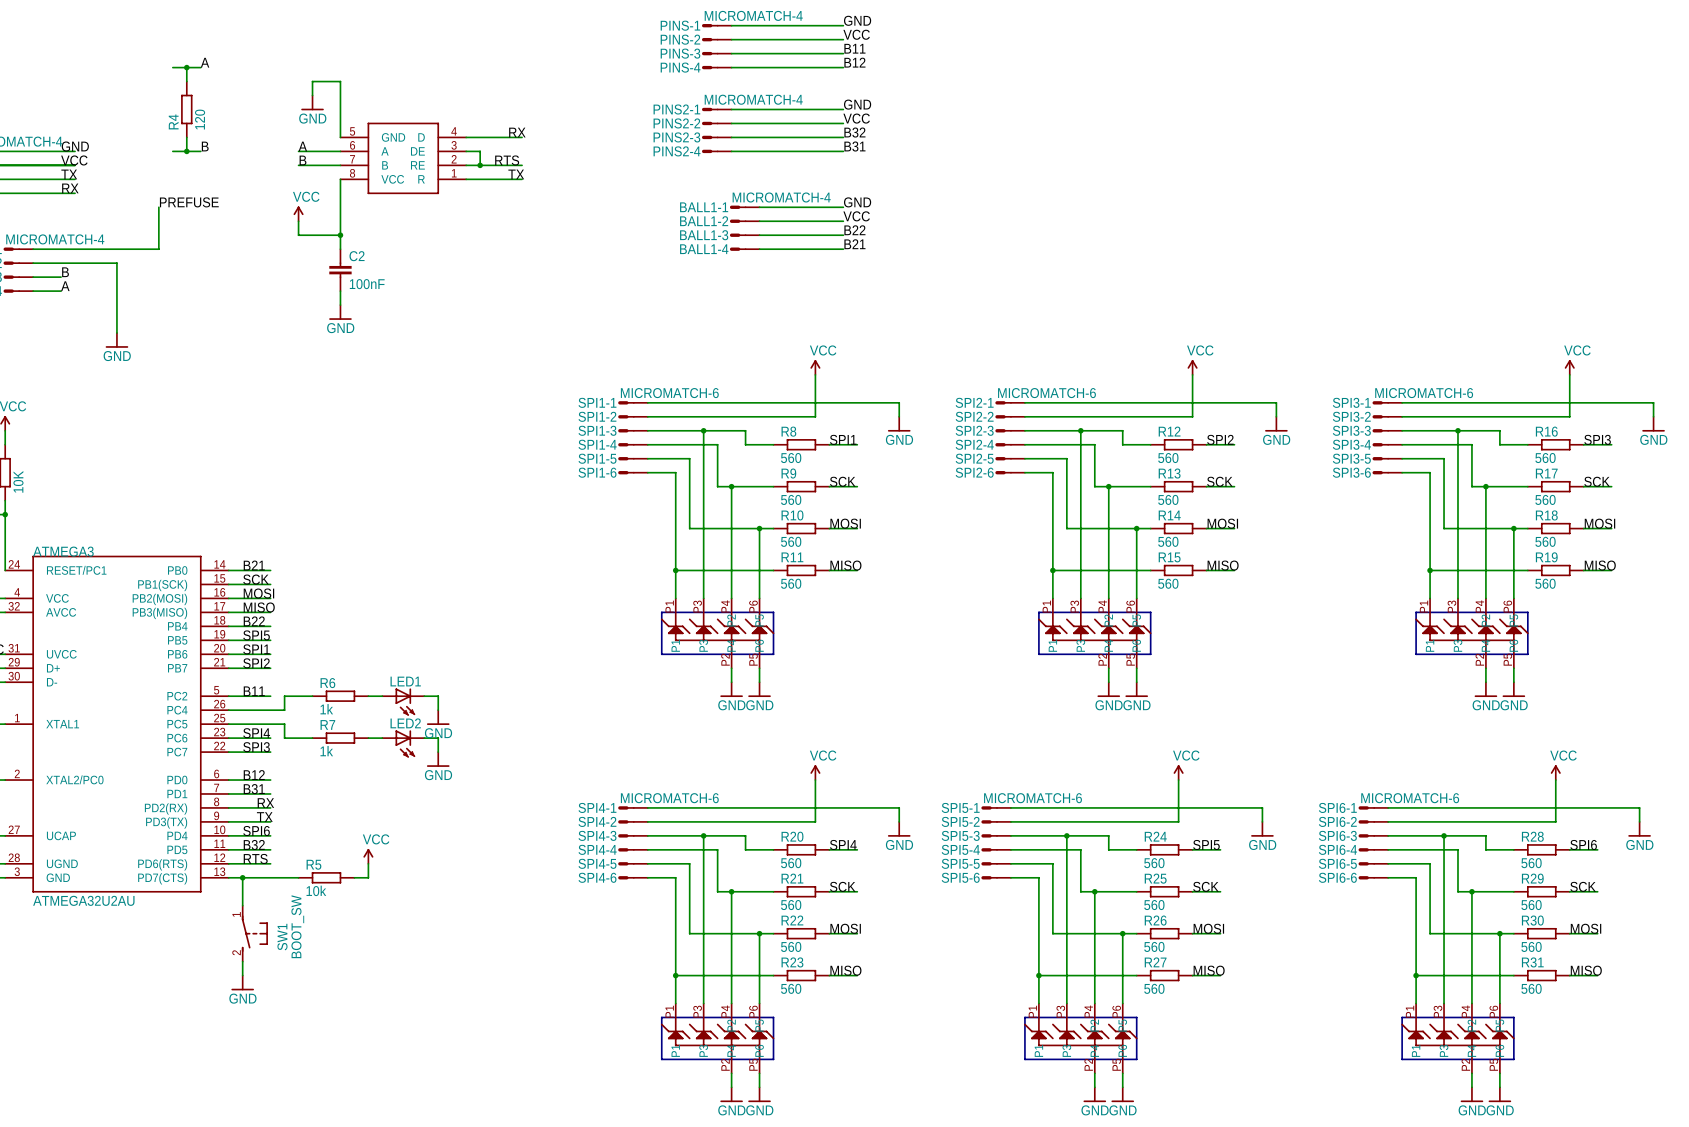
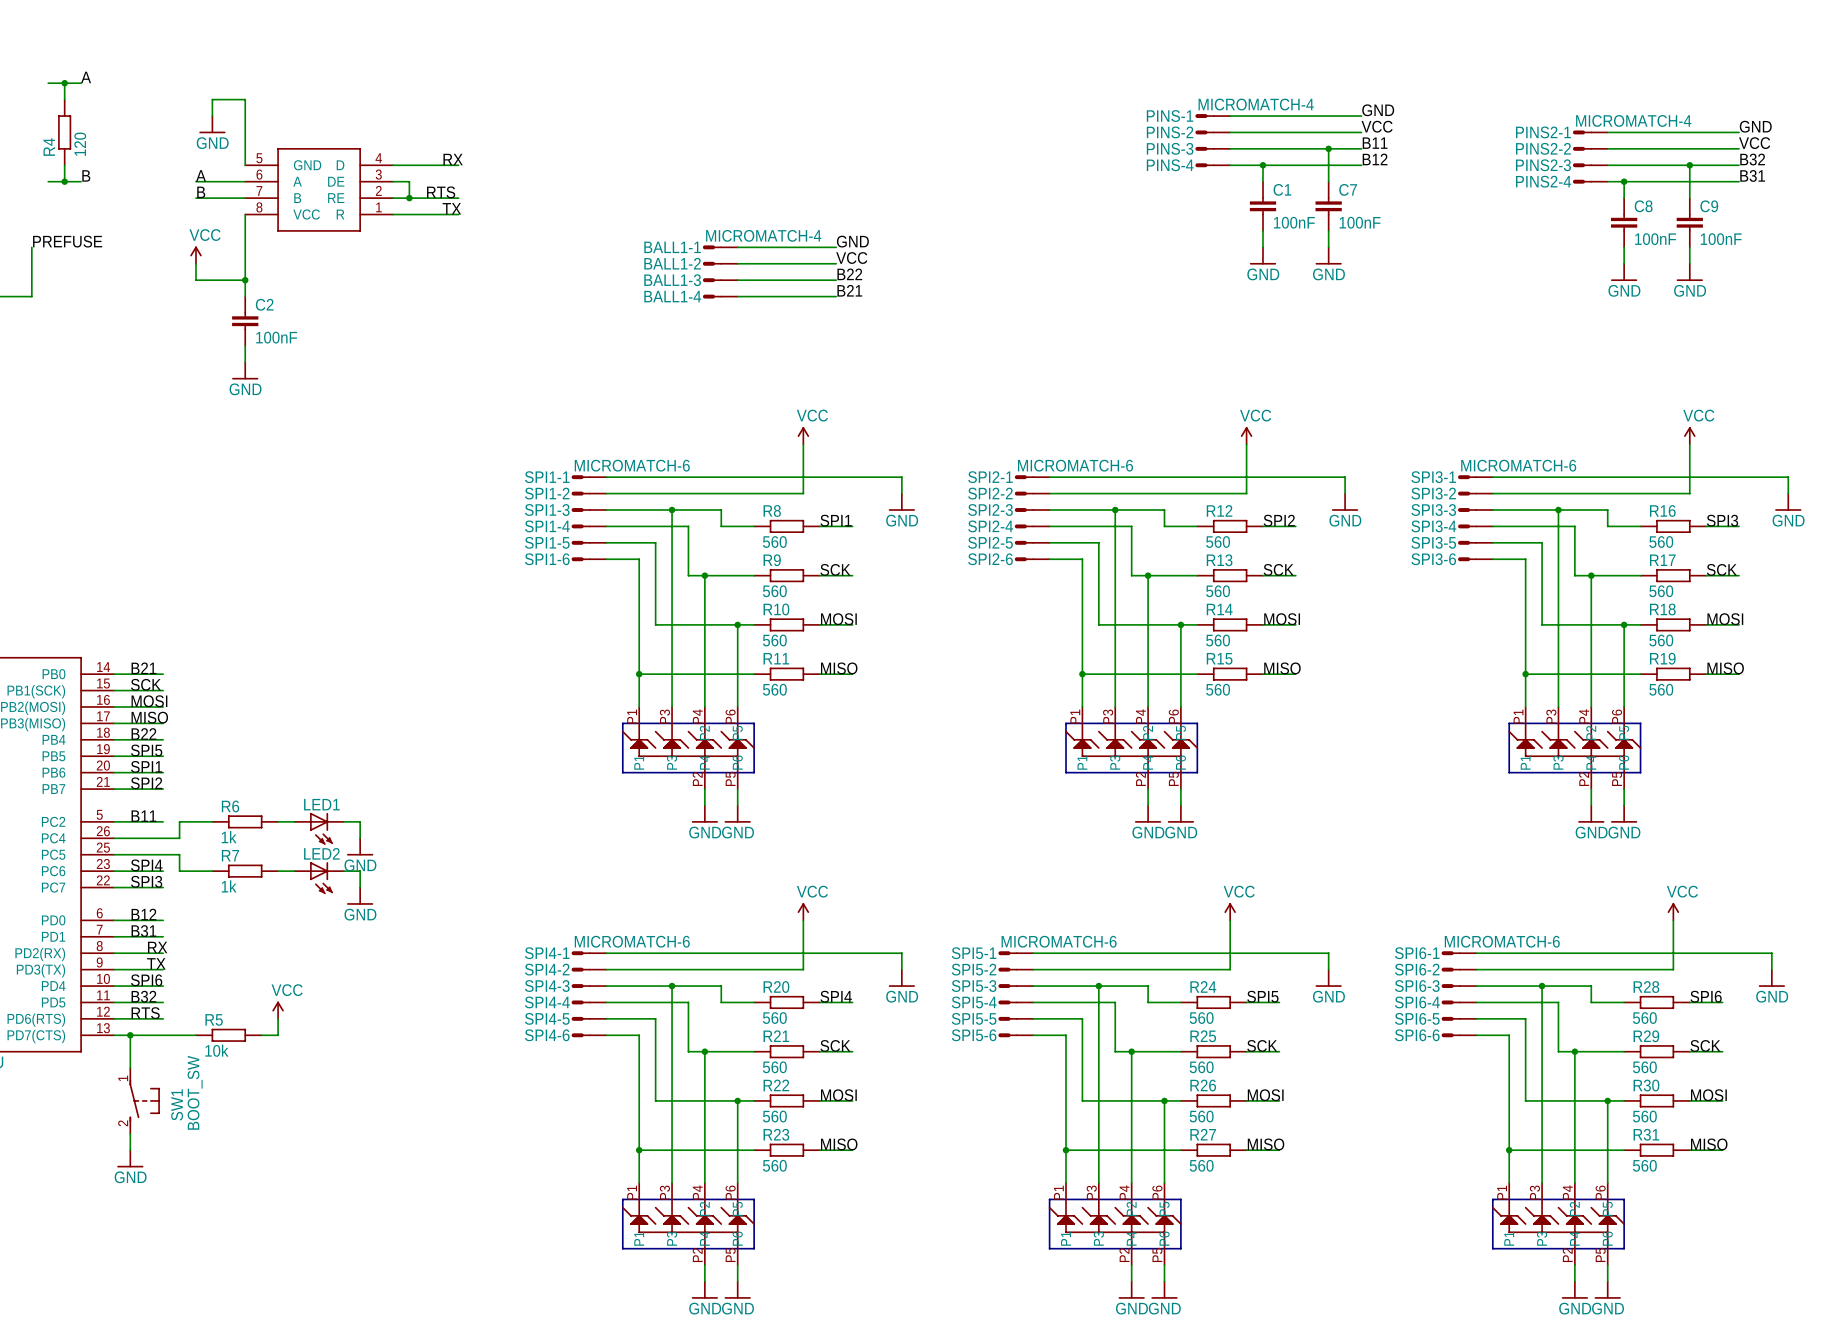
label: GND (857, 20) -> none
PINS-1 position: (716, 25) -> (1212, 116)
wire: (731, 25) (843, 25) -> none
label: VCC (856, 34) -> none
PINS-2 position: (716, 39) -> (1212, 132)
wire: (731, 39) (843, 39) -> none
label: B11 (854, 48) -> none
PINS-3 position: (716, 53) -> (1212, 148)
wire: (731, 53) (843, 53) -> none
label: B12 (854, 62) -> none
PINS-4 position: (716, 67) -> (1212, 165)
wire: (731, 67) (843, 67) -> none
label: none -> GND (1378, 110)
wire: none -> (1230, 116) (1361, 116)
label: GND (857, 104) -> none
label: none -> VCC (1377, 126)
label: none -> GND (1755, 126)
PINS2-1 position: (716, 109) -> (1590, 132)
wire: (731, 109) (843, 109) -> none
wire: none -> (1230, 132) (1361, 132)
wire: none -> (1607, 132) (1739, 132)
label: VCC (856, 118) -> none
label: none -> B11 (1375, 143)
label: none -> VCC (1754, 143)
PINS2-2 position: (716, 123) -> (1590, 148)
wire: (731, 123) (843, 123) -> none
wire: none -> (1230, 148) (1361, 148)
wire: none -> (1328, 148) (1328, 181)
junction: none -> (1328, 148)
wire: none -> (1607, 148) (1739, 148)
label: B32 (854, 132) -> none
label: none -> B12 (1375, 159)
label: none -> B32 (1752, 159)
PINS2-3 position: (716, 137) -> (1590, 165)
wire: (731, 137) (843, 137) -> none
wire: none -> (1230, 165) (1361, 165)
wire: none -> (1262, 165) (1262, 181)
junction: none -> (1262, 165)
wire: none -> (1607, 165) (1739, 165)
wire: none -> (1689, 165) (1689, 198)
junction: none -> (1689, 165)
label: B31 (854, 146) -> none
label: none -> B31 (1752, 175)
PINS2-4 position: (716, 151) -> (1590, 181)
wire: (731, 151) (843, 151) -> none
wire: none -> (1607, 181) (1739, 181)
wire: none -> (1624, 181) (1624, 198)
junction: none -> (1624, 181)
C1: none -> 100nF (1262, 206)
C7: none -> 100nF (1328, 206)
C8: none -> 100nF (1624, 222)
C9: none -> 100nF (1689, 222)
wire: none -> (1262, 230) (1262, 247)
wire: none -> (1328, 230) (1328, 247)
wire: none -> (1624, 247) (1624, 263)
wire: none -> (1689, 247) (1689, 263)
power symbol: none -> GND (1262, 255)
power symbol: none -> GND (1328, 255)
power symbol: none -> GND (1624, 272)
power symbol: none -> GND (1689, 272)

